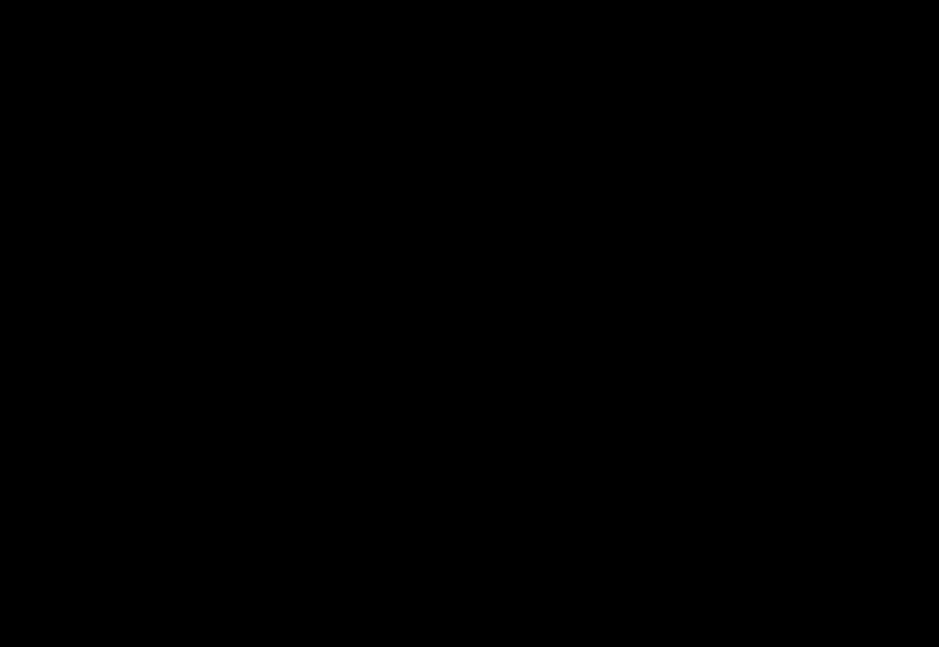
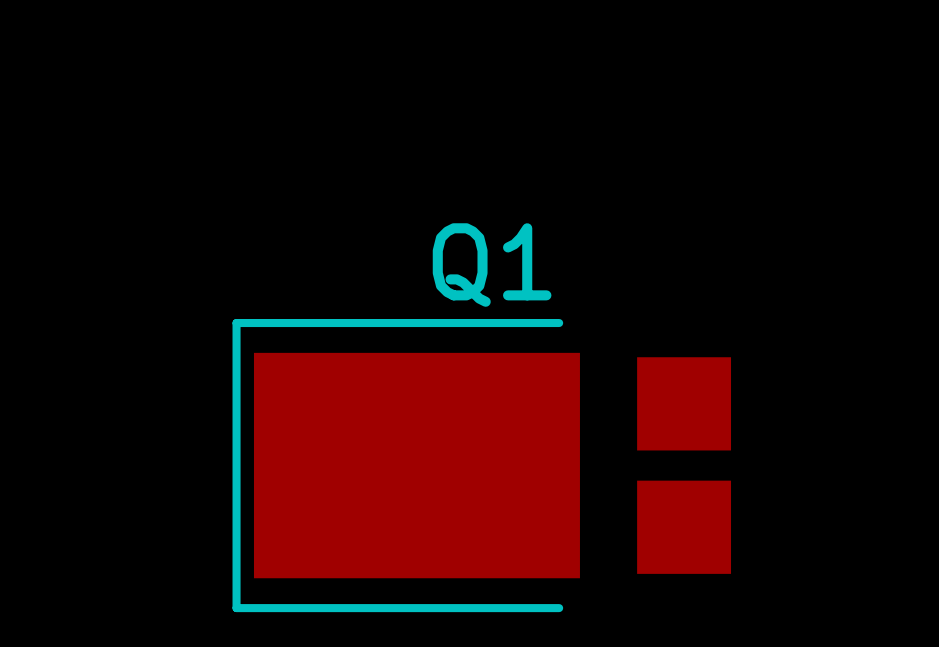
Q1: none -> (481, 465)

